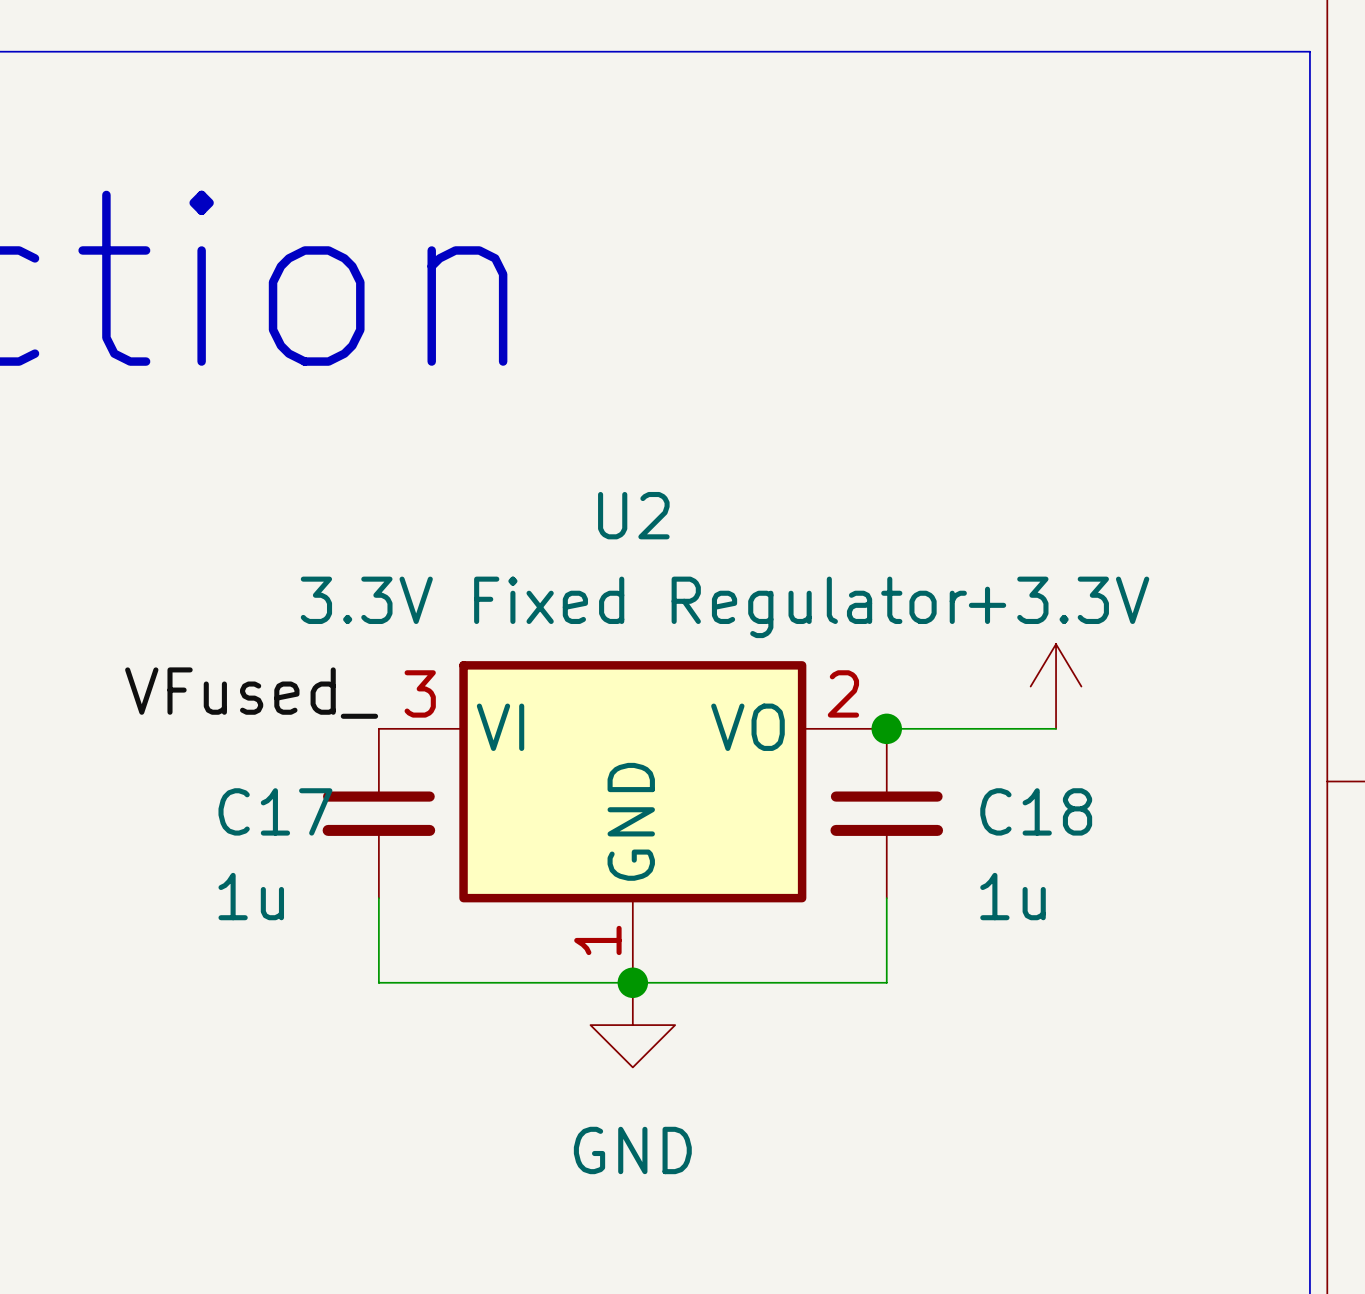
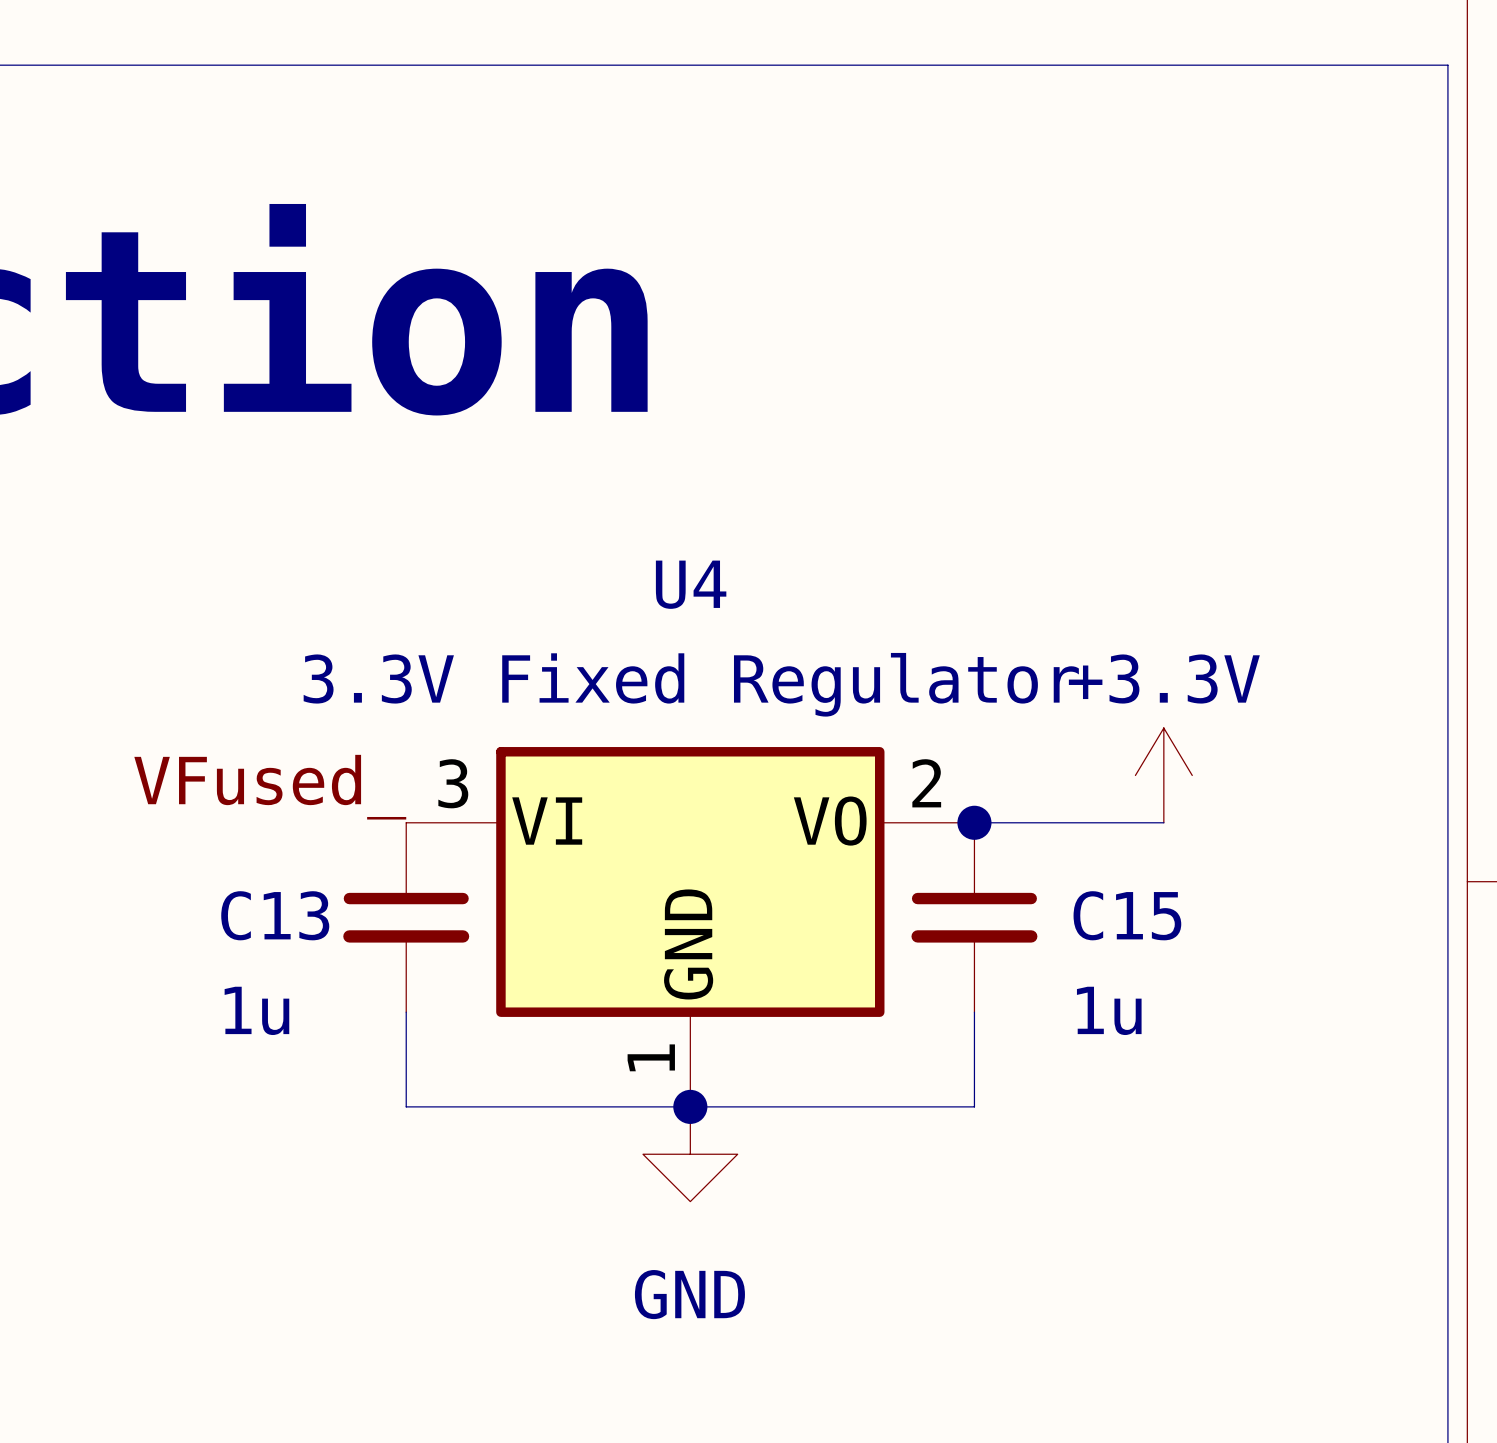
U2 name: U2 (633, 515) -> U4 (691, 584)
C17 name: C17 (275, 811) -> C13 (275, 915)
C18 name: C18 (1036, 811) -> C15 (1127, 915)

